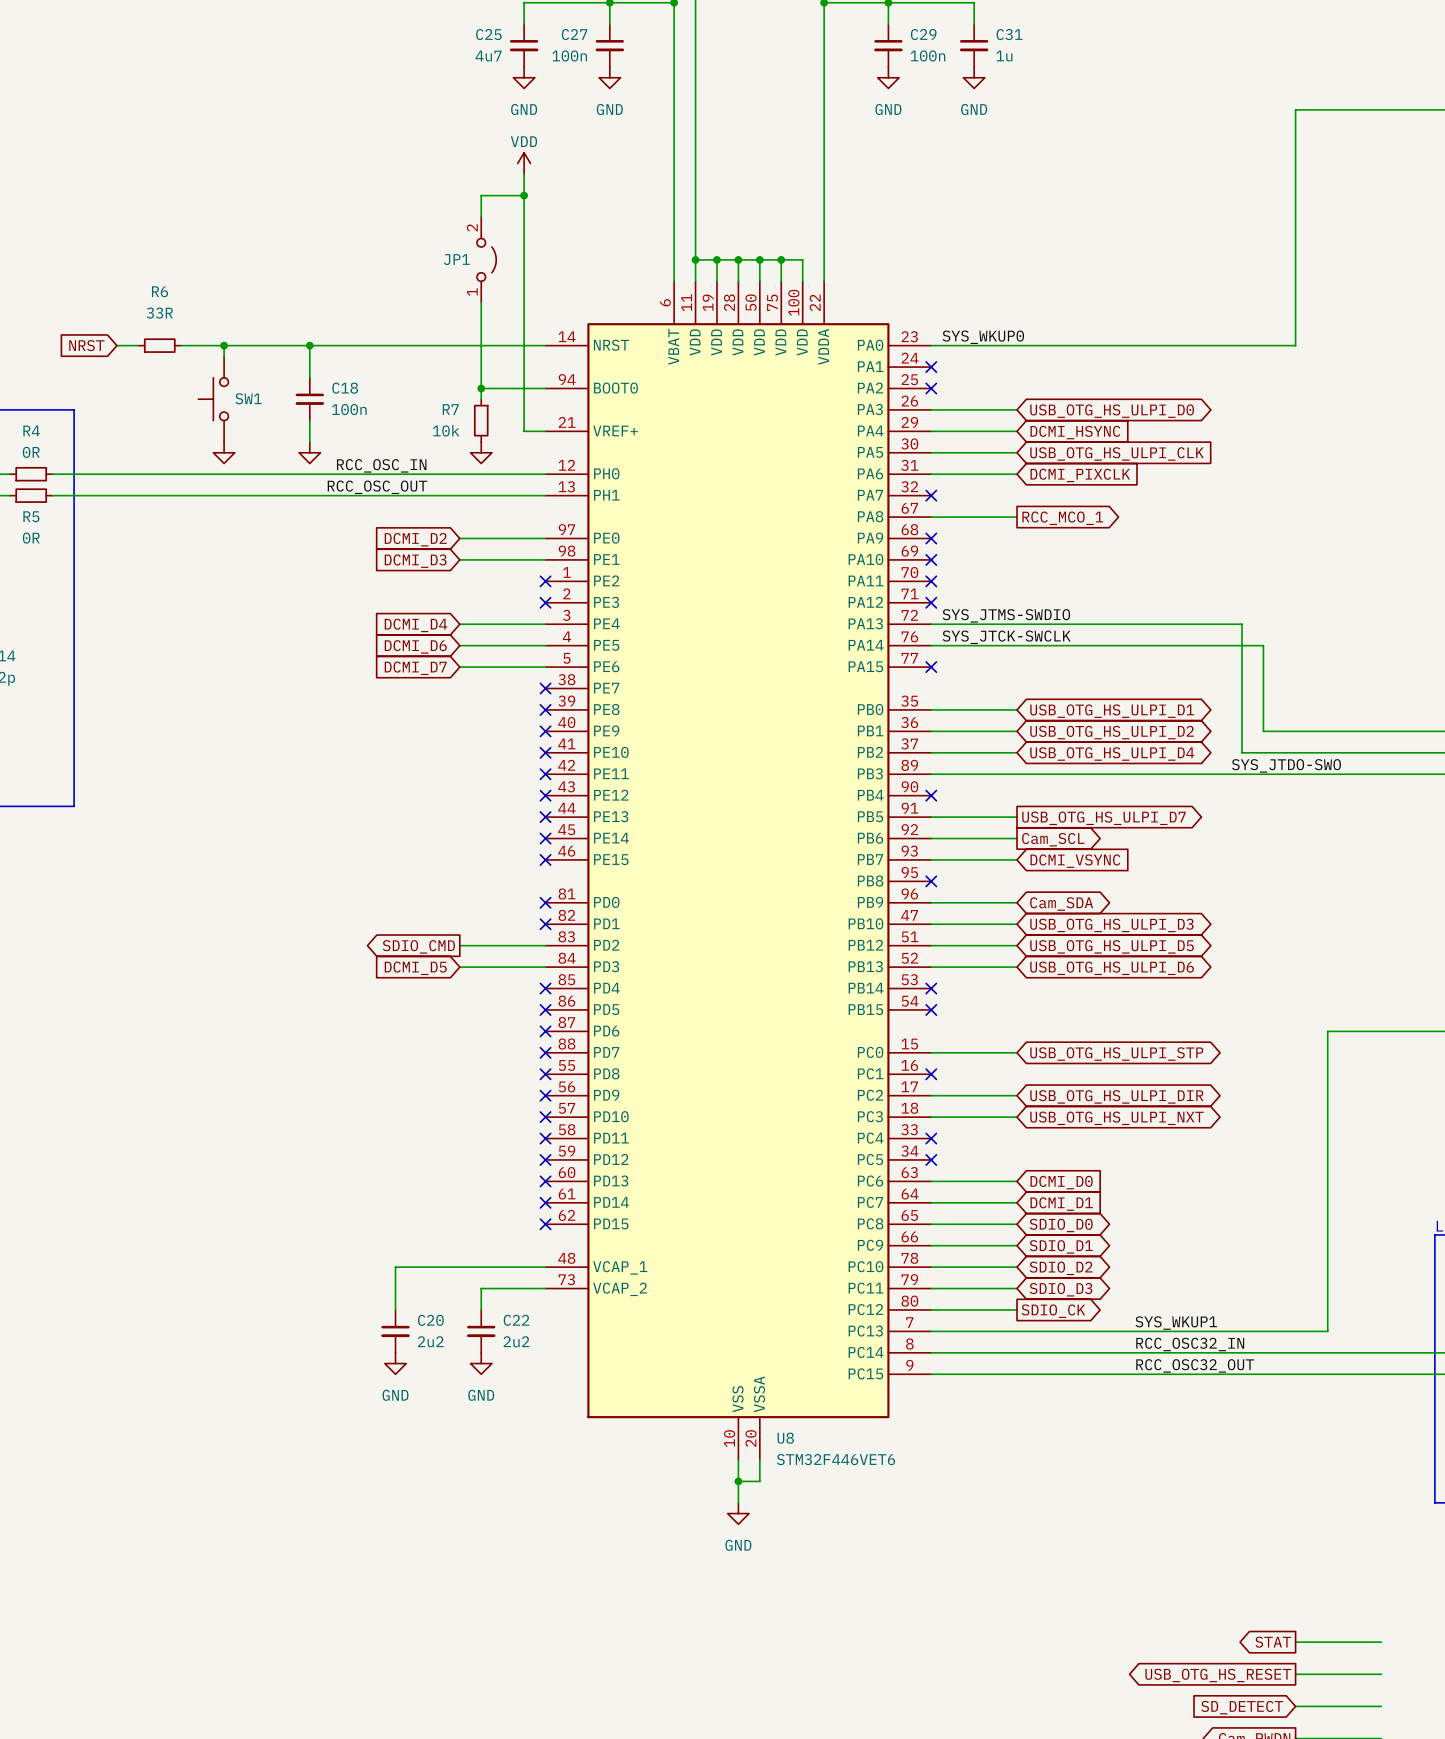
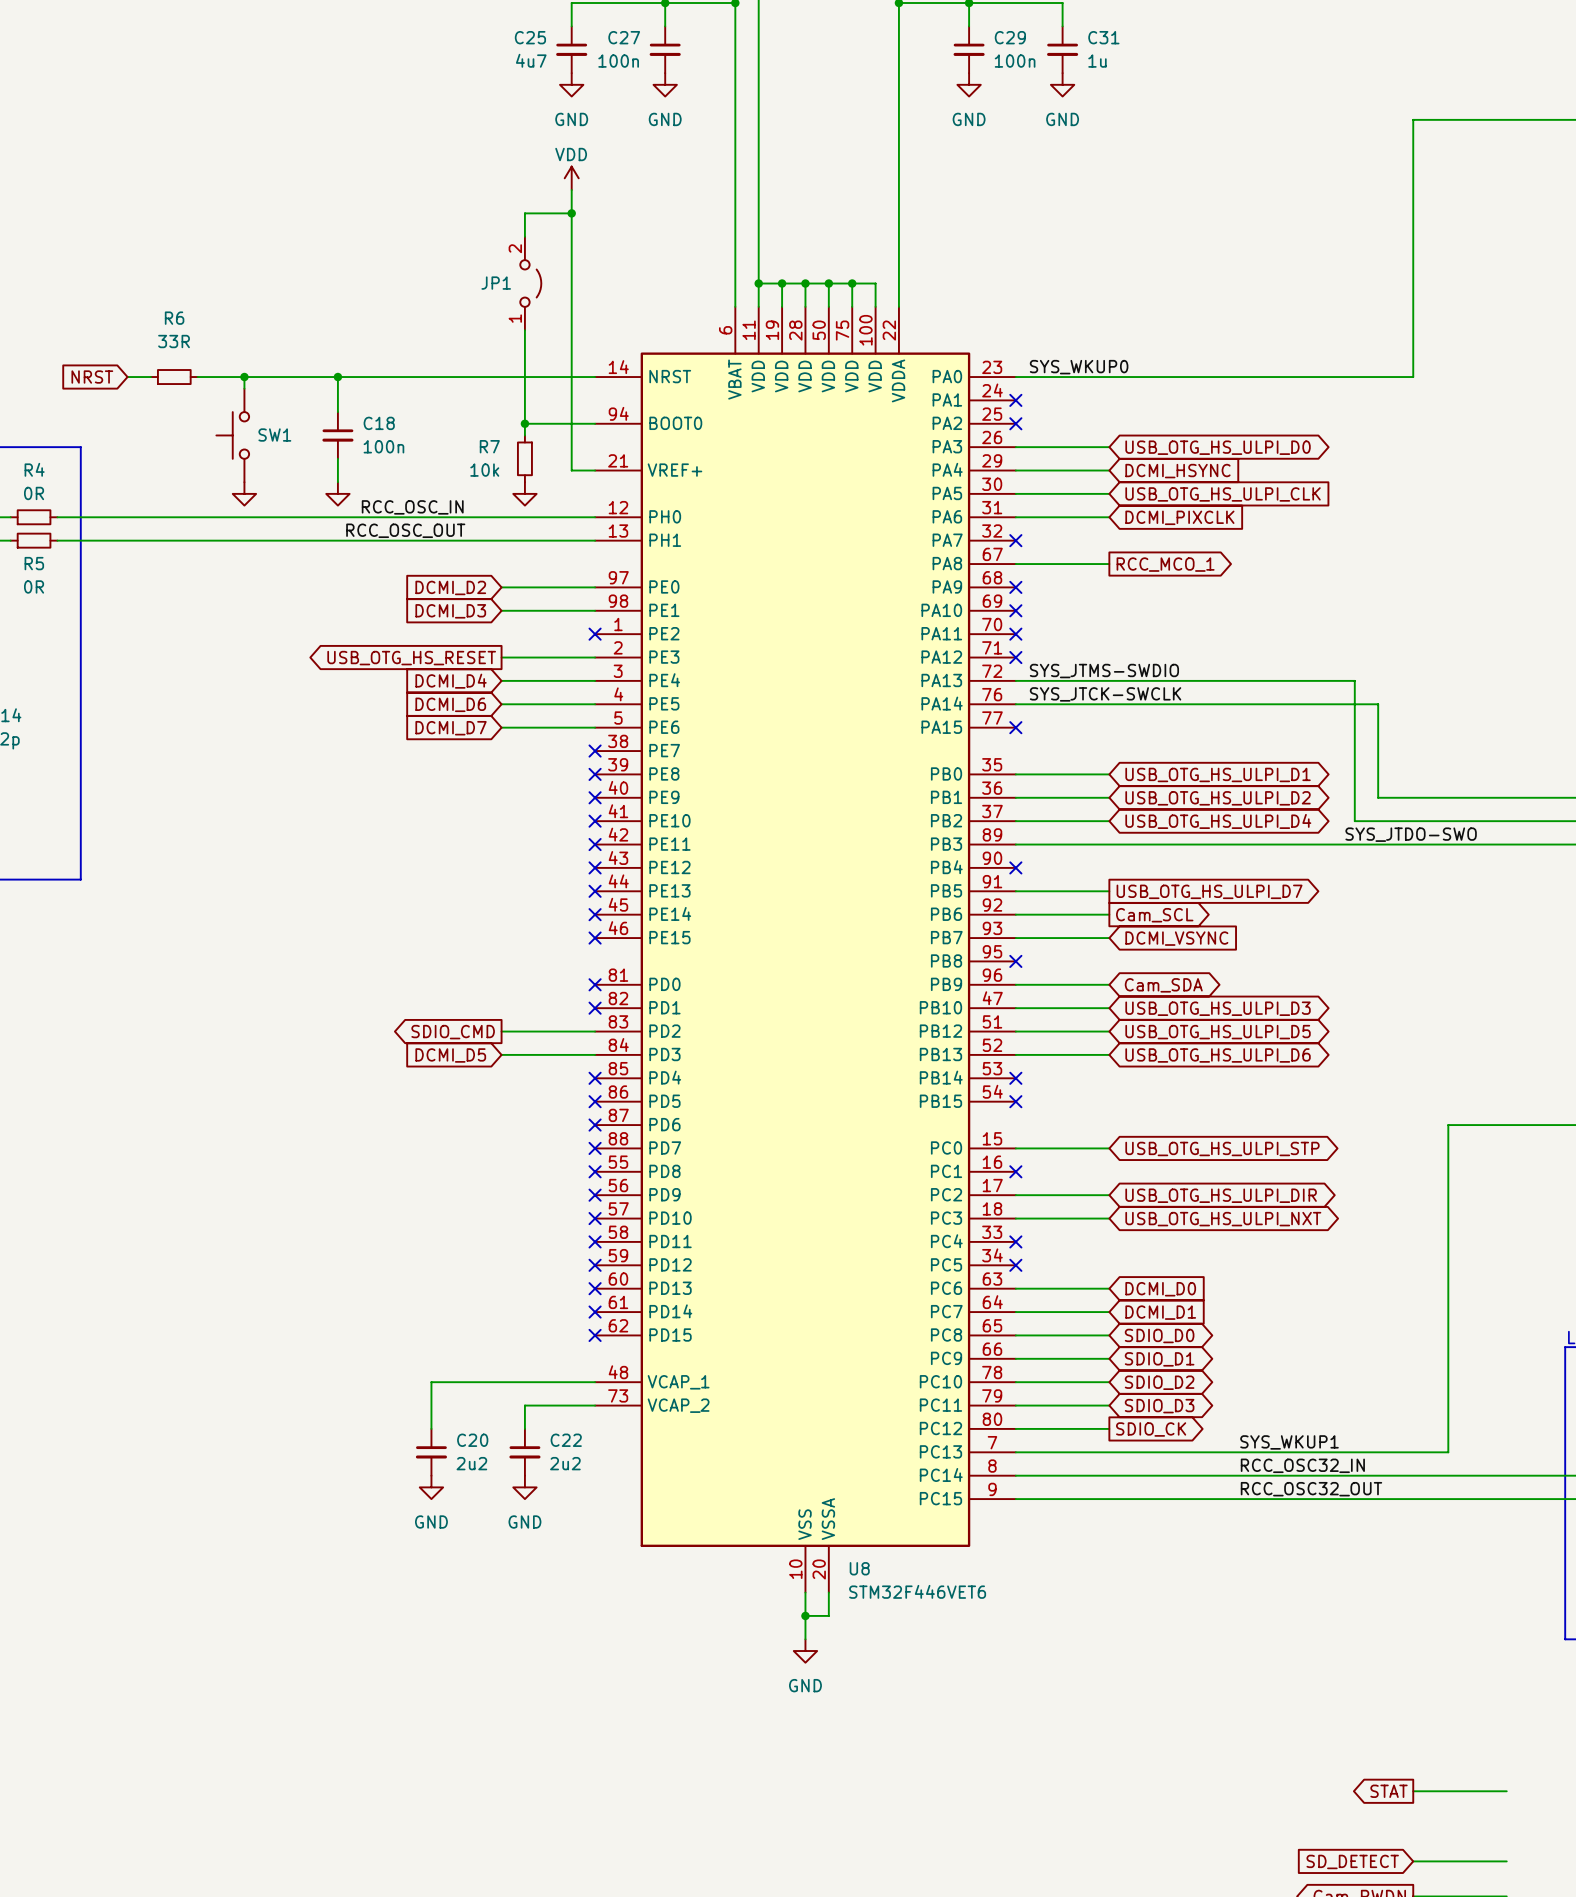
wire: none -> (501, 657) (595, 657)
no-connect mark: (545, 602) -> none
global label: none -> USB_OTG_HS_RESET (411, 658)
wire: (1295, 1674) (1381, 1674) -> none
global label: USB_OTG_HS_RESET (1218, 1675) -> none

